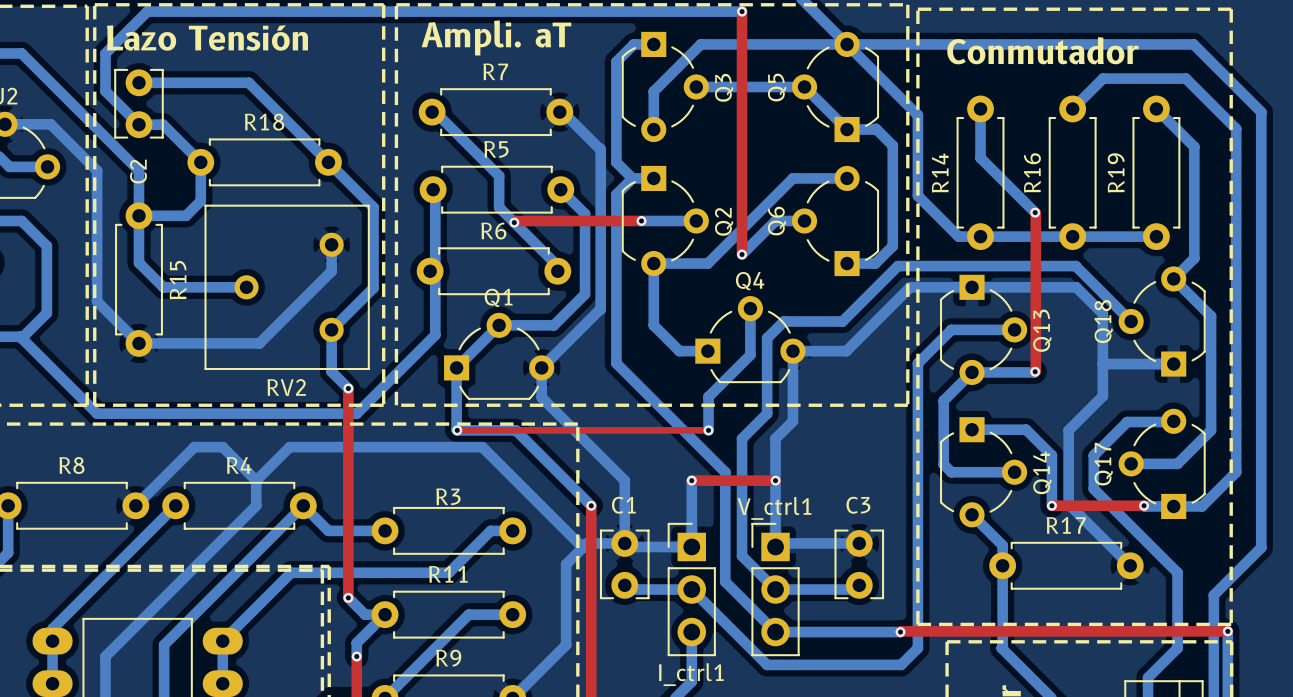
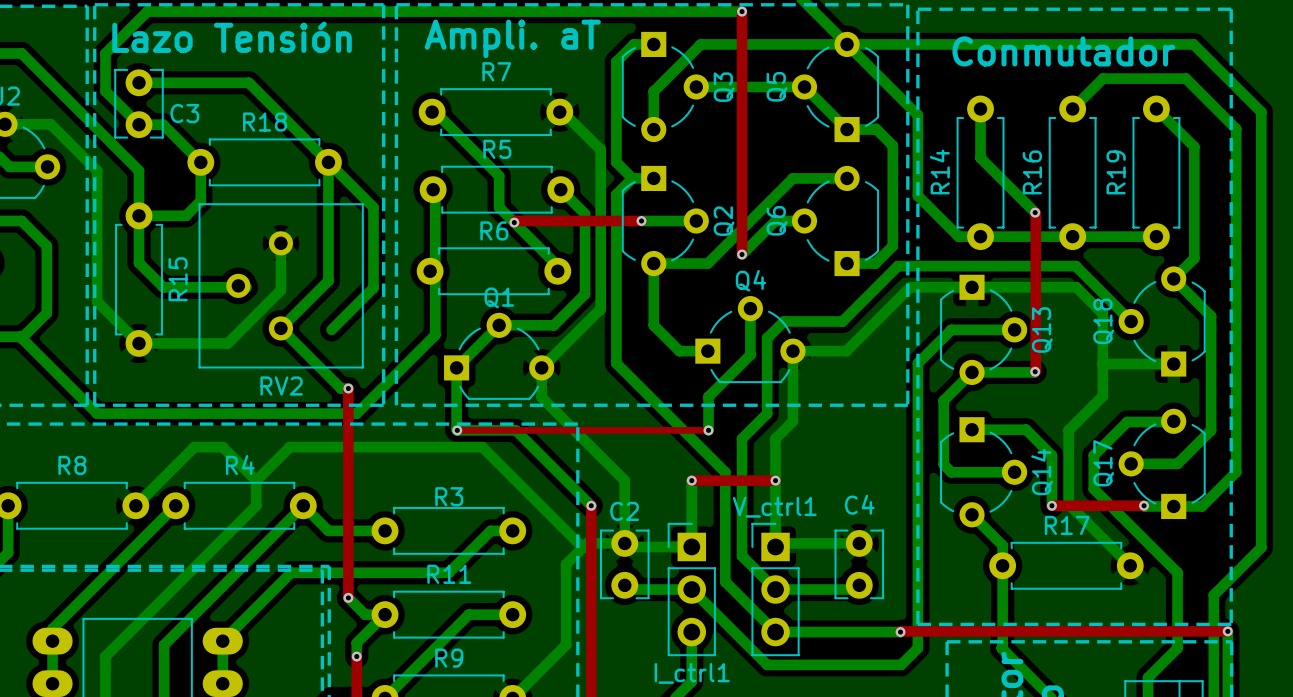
C2 name: C2 (138, 171) -> C3 (184, 113)
RV2 footprint: [204, 204, 370, 370] -> [198, 203, 364, 369]
bottom track: (331, 244) (331, 271) (259, 343) (227, 343) -> (280, 243) (280, 290) (227, 343)
bottom track: (331, 329) (331, 371) (348, 388) -> (328, 162) (328, 280) (280, 328) (341, 388) (348, 388)
C1 name: C1 (623, 505) -> C2 (624, 511)
C3 name: C3 (858, 505) -> C4 (859, 504)

